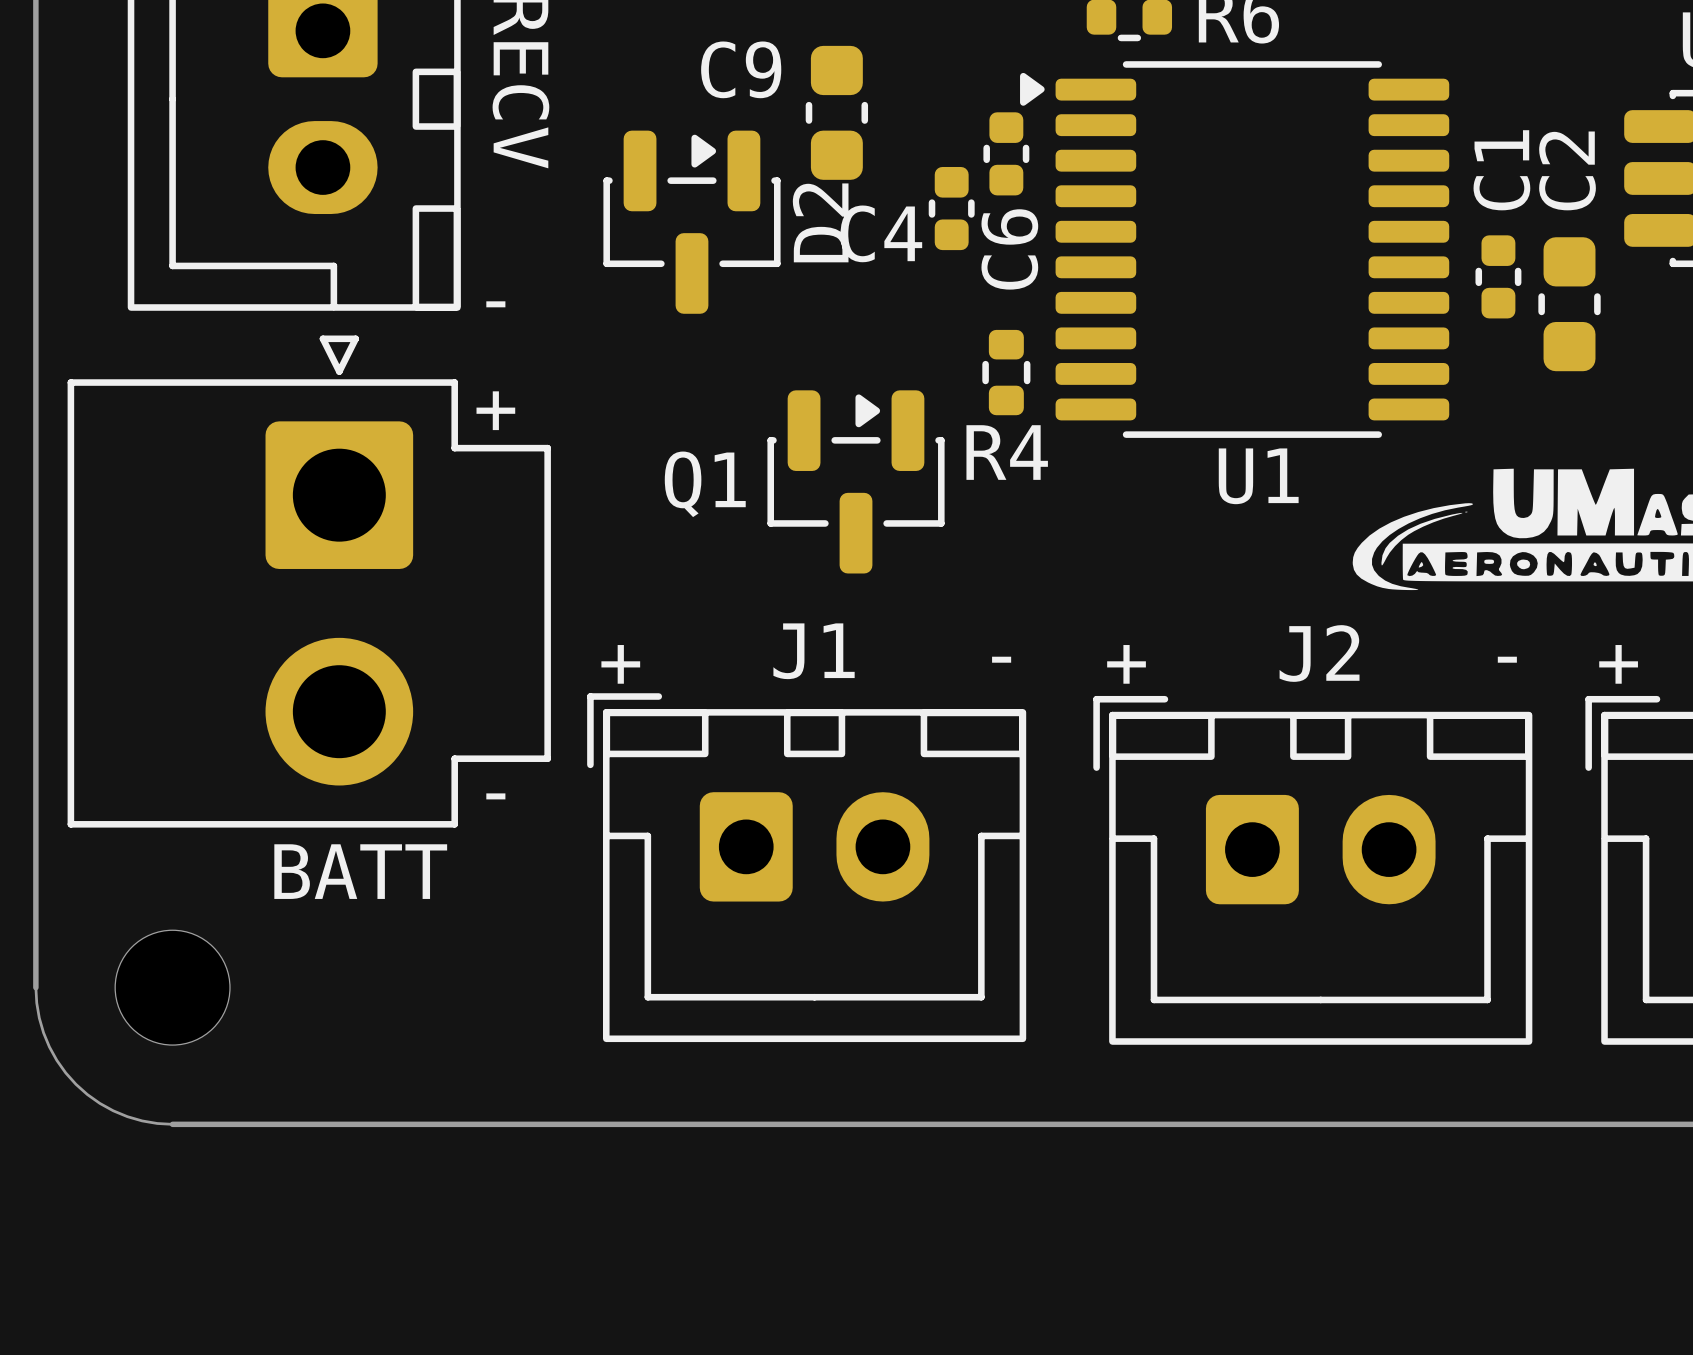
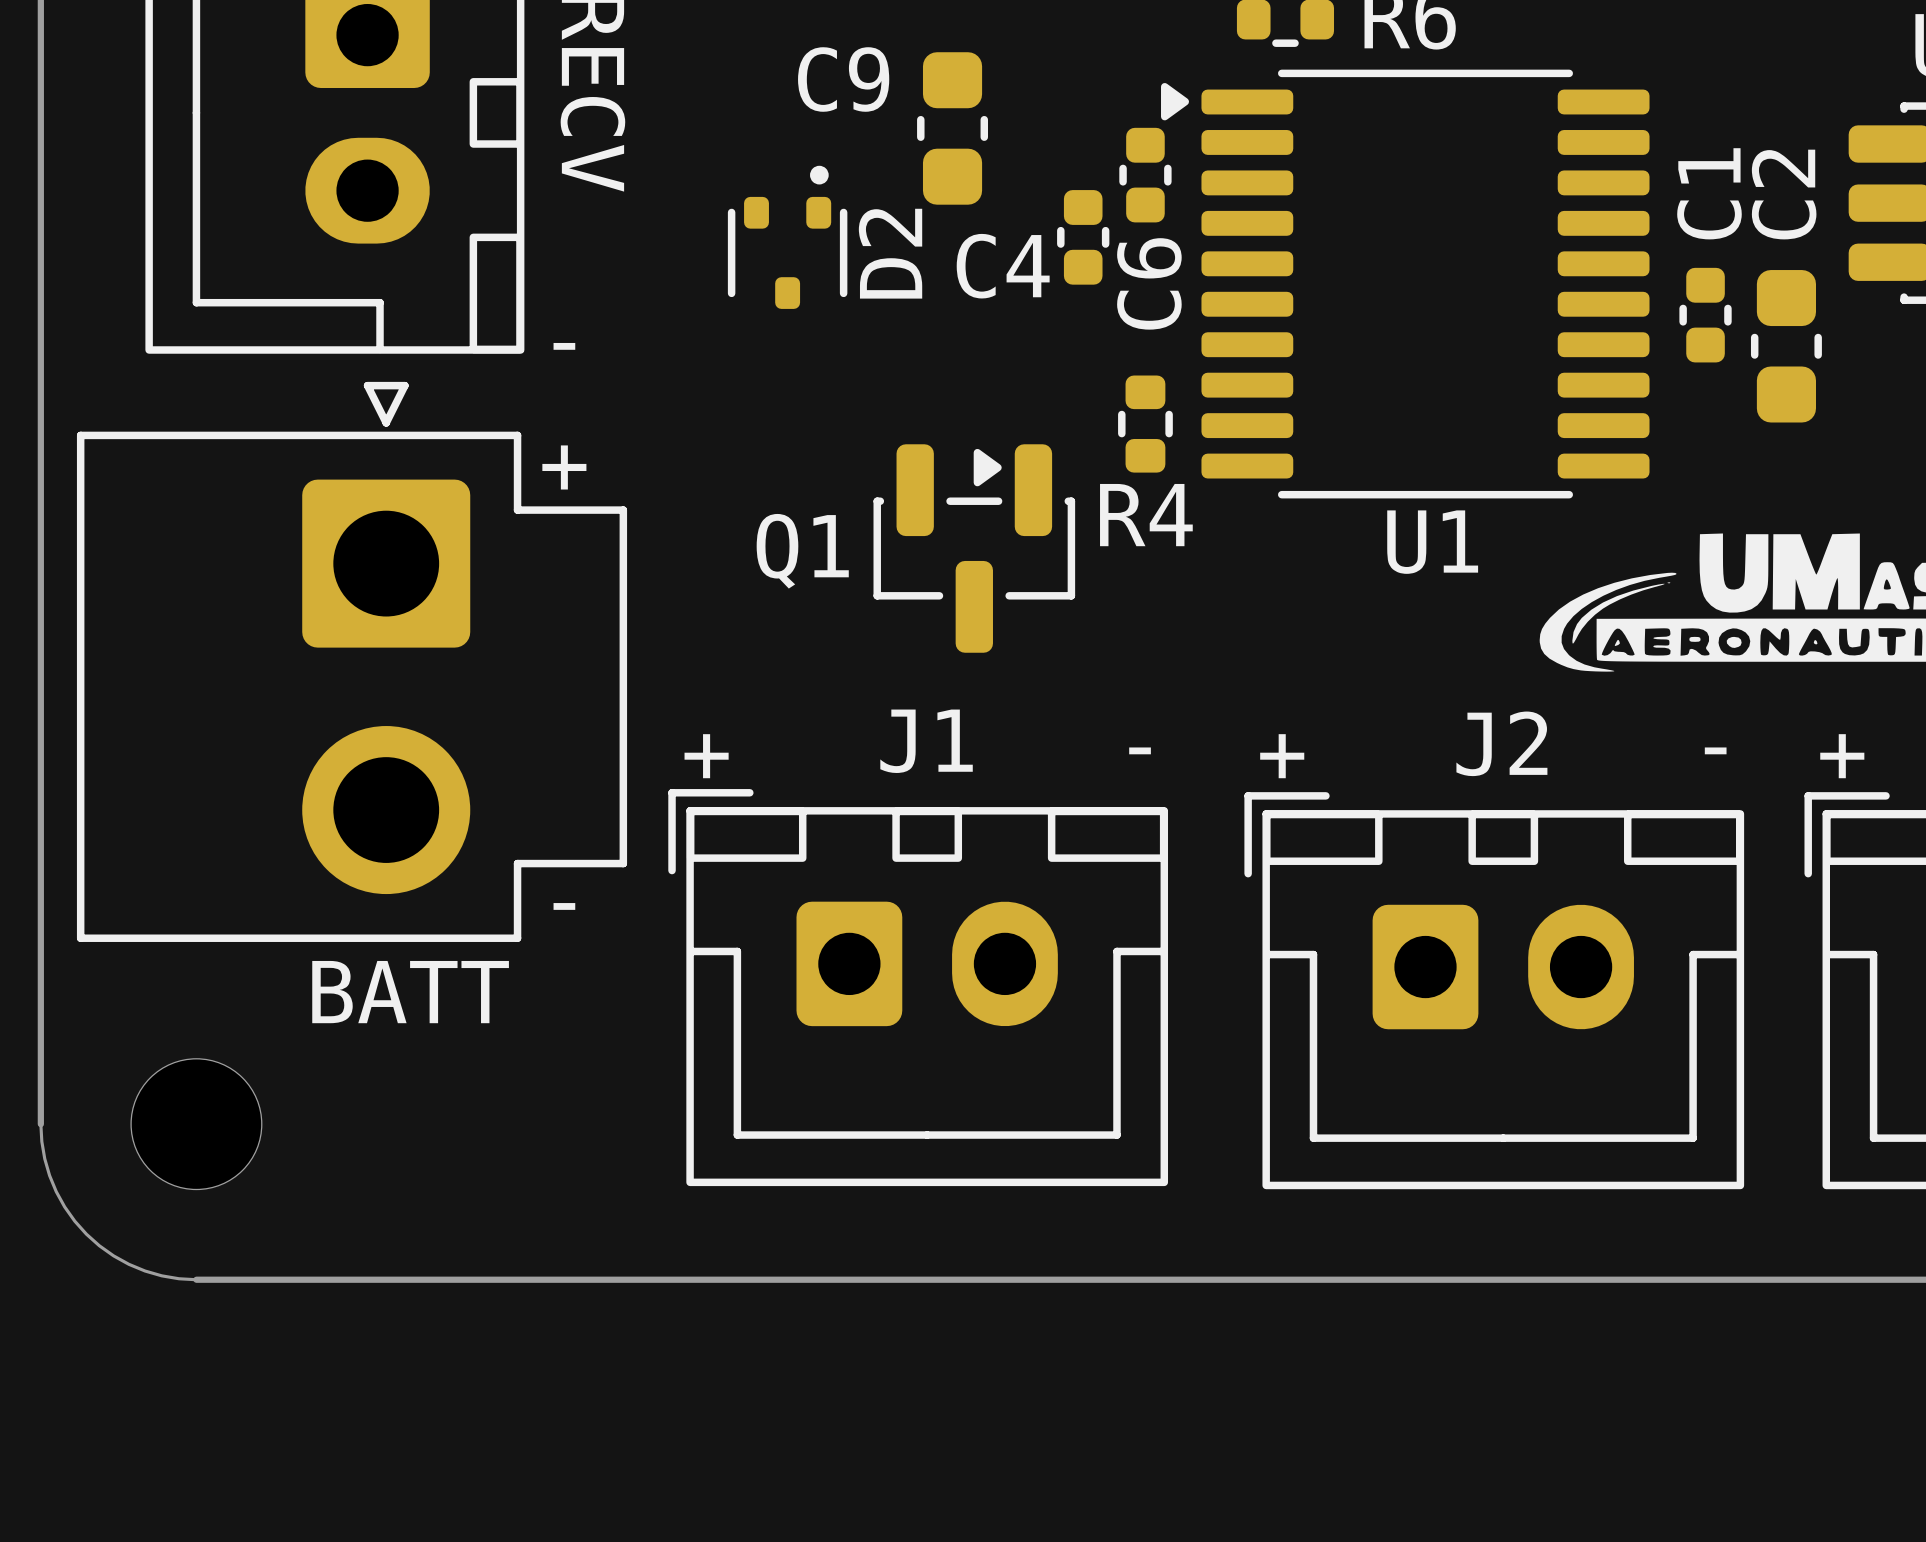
D2 footprint: [603, 130, 781, 314] -> [727, 165, 848, 309]
D2 name position: D2 (820, 222) -> D2 (890, 253)

